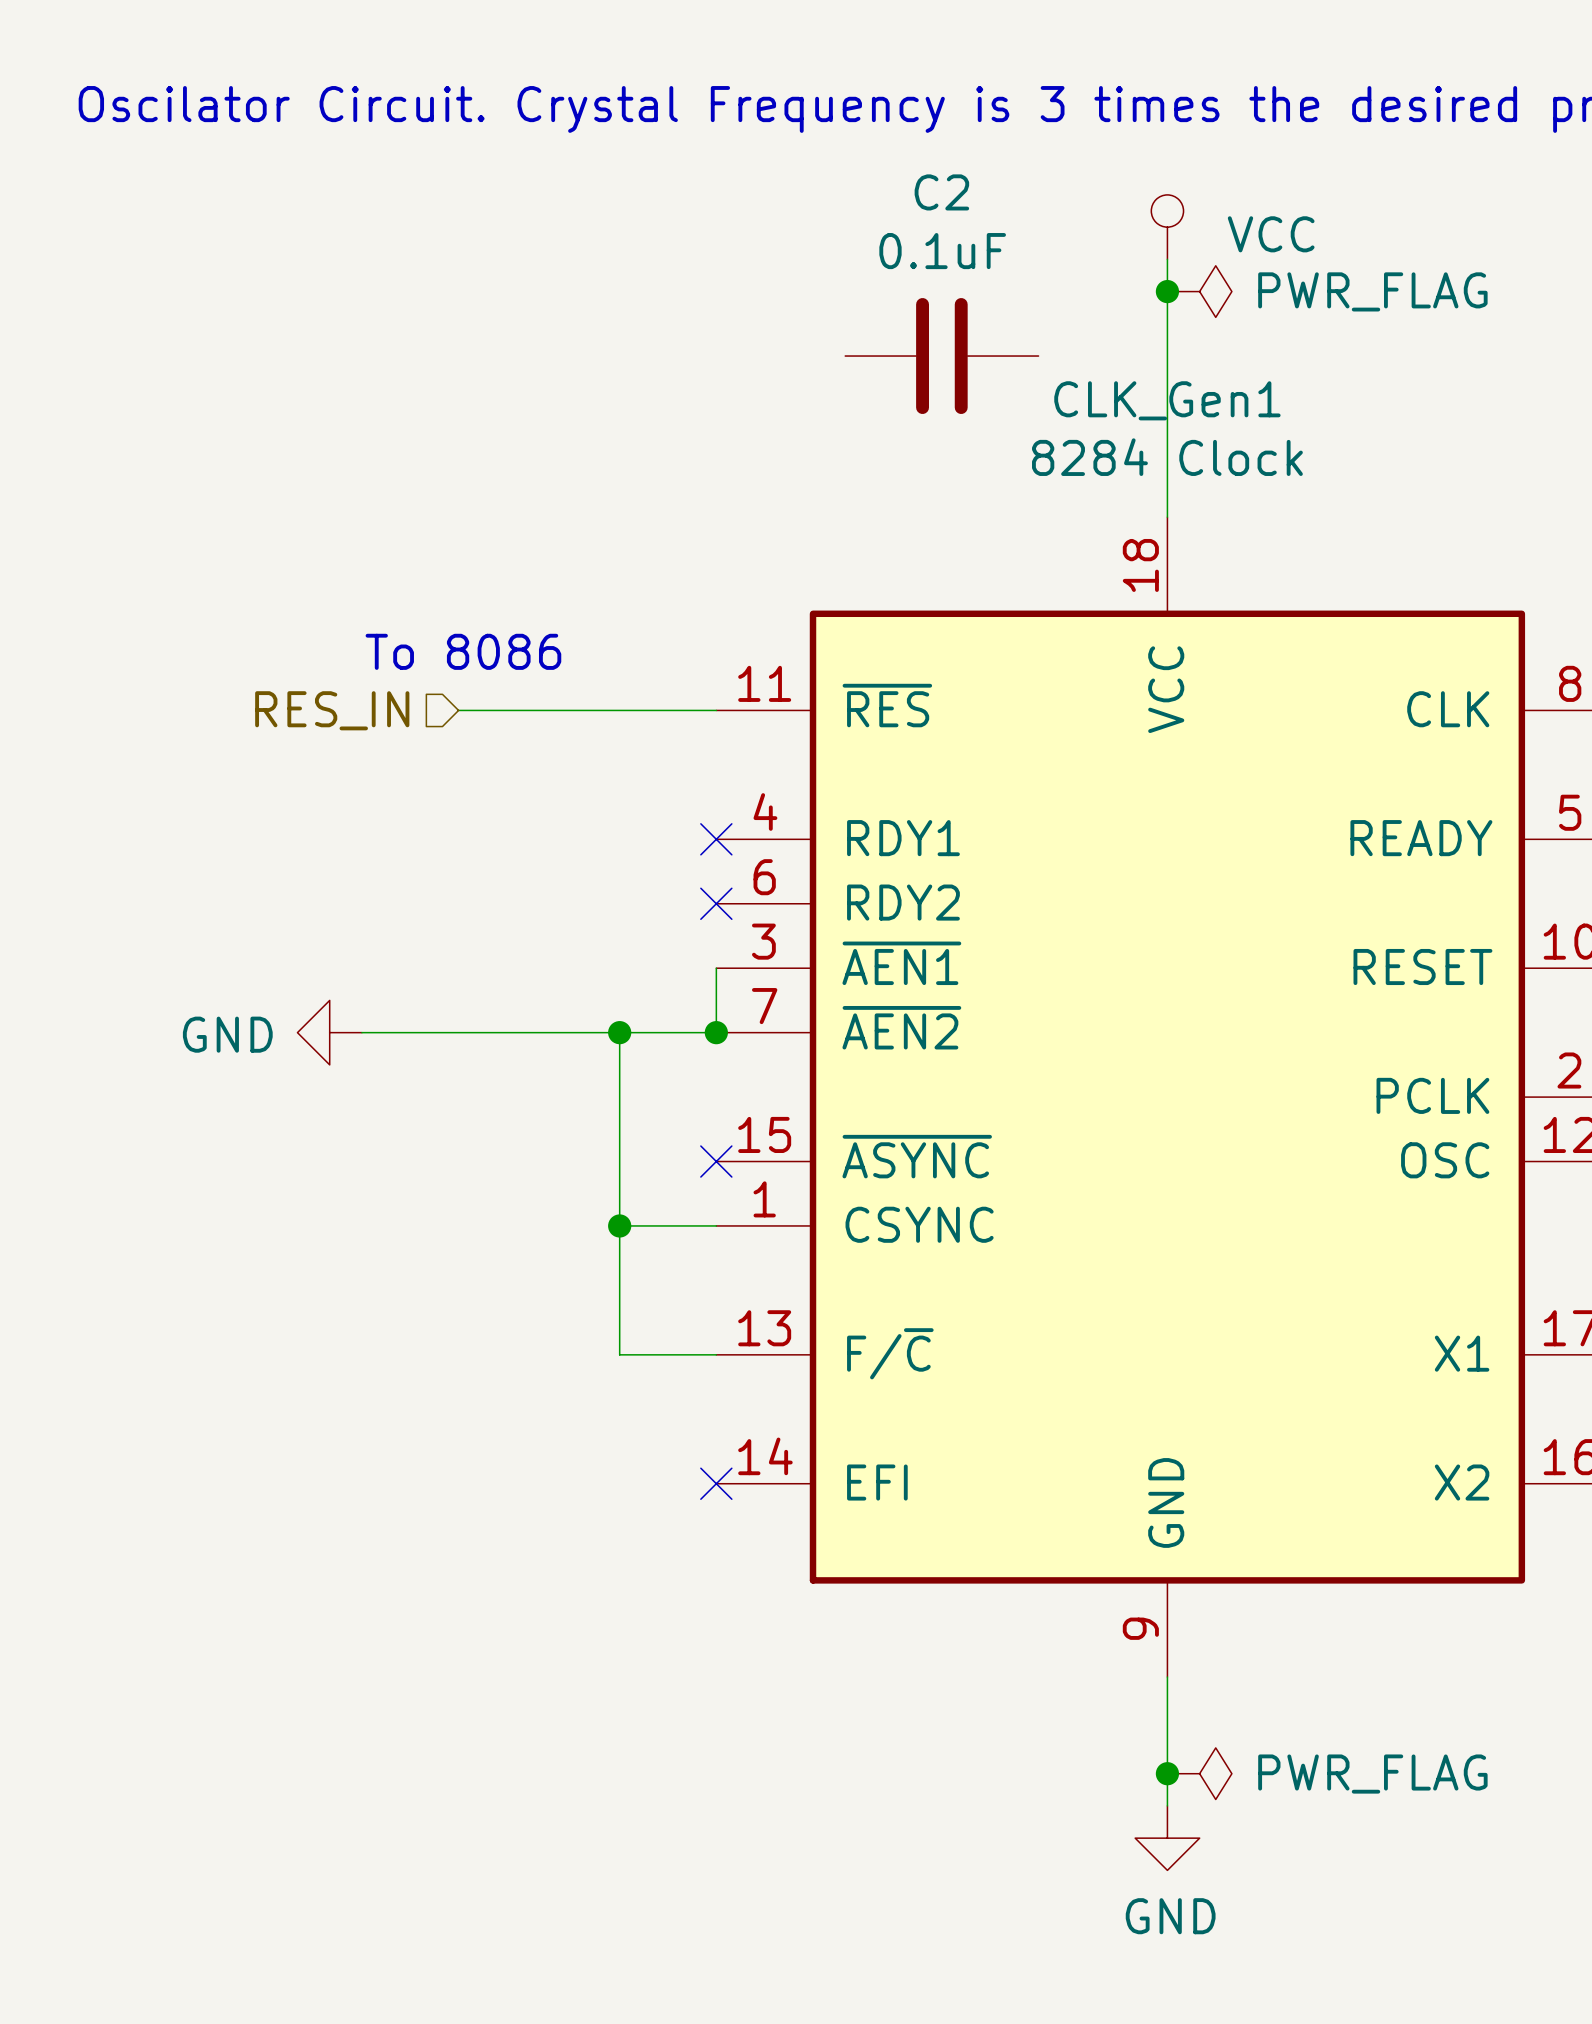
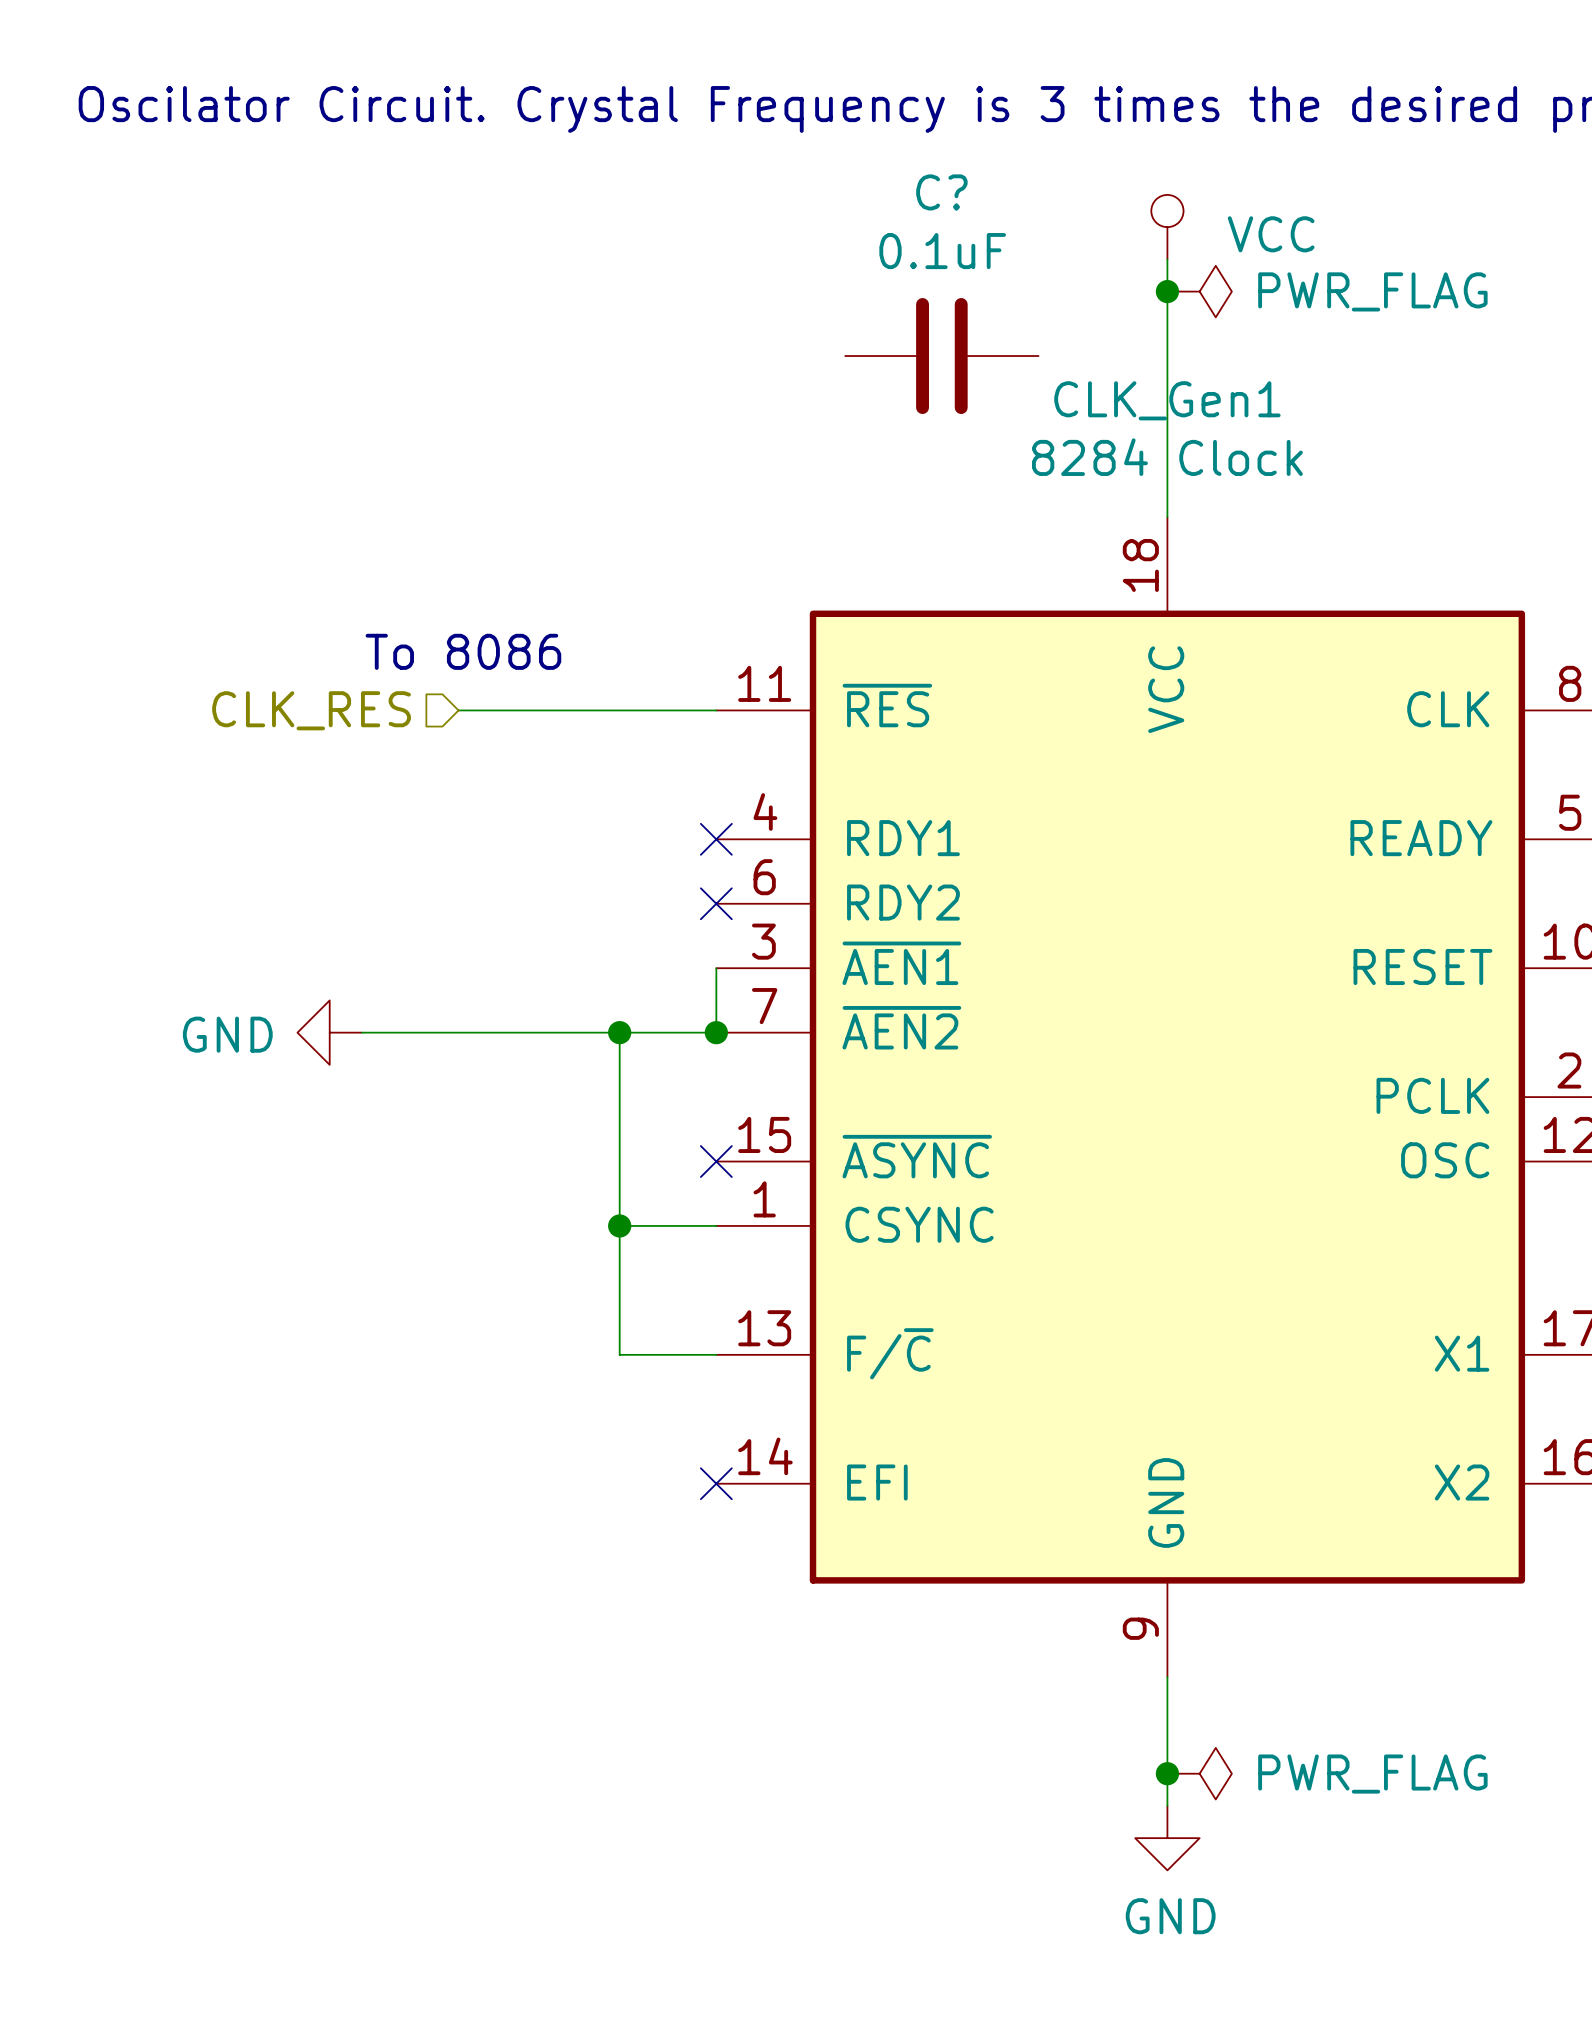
C2 name: C2 (941, 192) -> C? (941, 192)
hierarchical label: RES_IN (332, 710) -> CLK_RES (311, 710)

